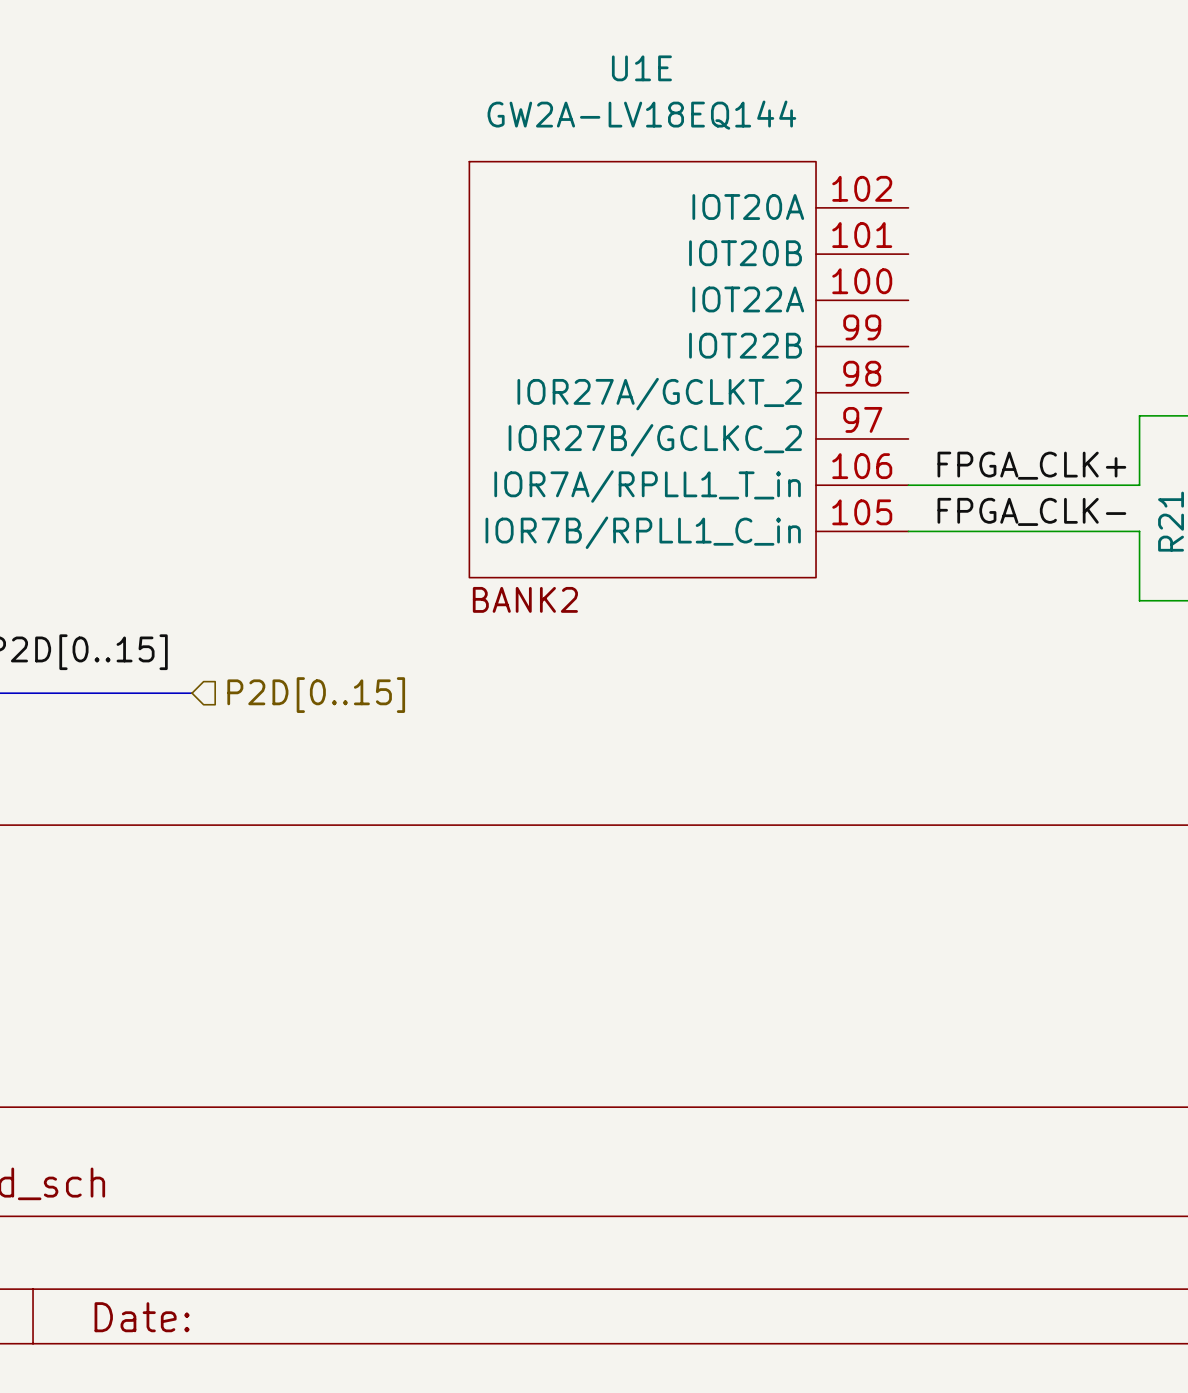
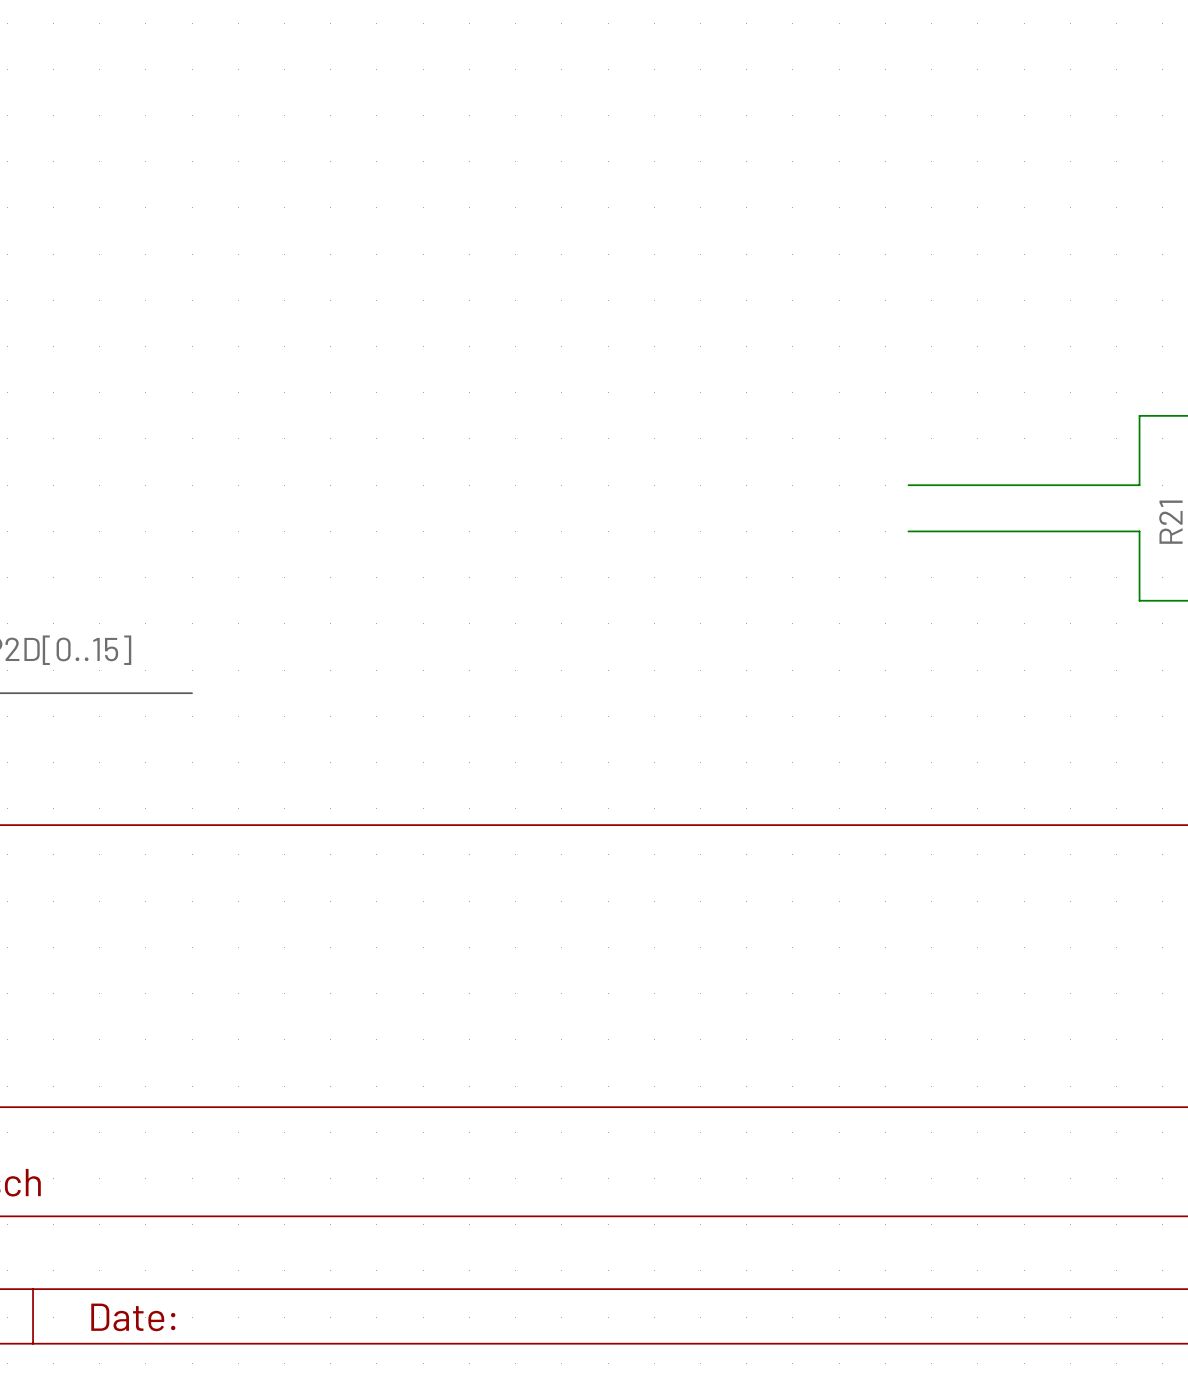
U1E: GW2A-LV18EQ144 (688, 369) -> none
label: FPGA_CLK+ (1031, 465) -> none
label: FPGA_CLK- (1031, 511) -> none
hierarchical label: P2D[0..15] (316, 695) -> none

